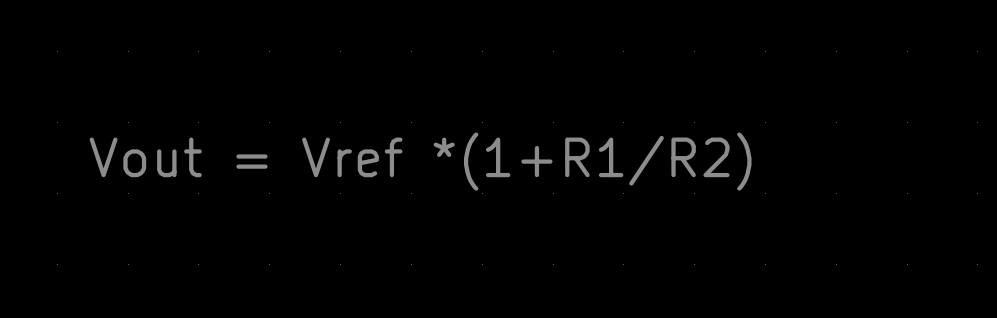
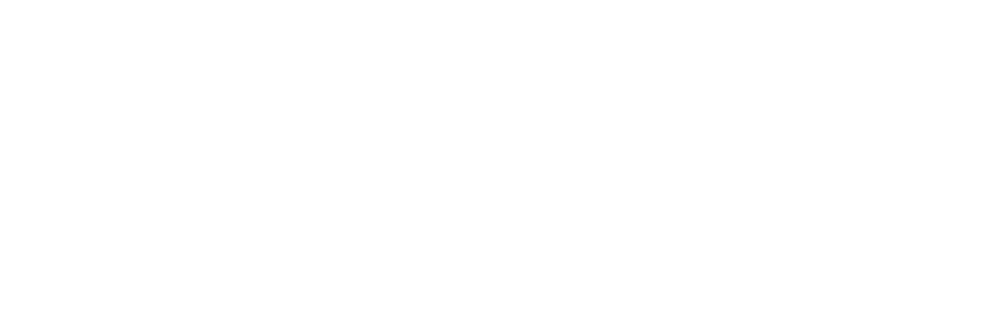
text: Vout = Vref *(1+R1/R2) (420, 161) -> none

